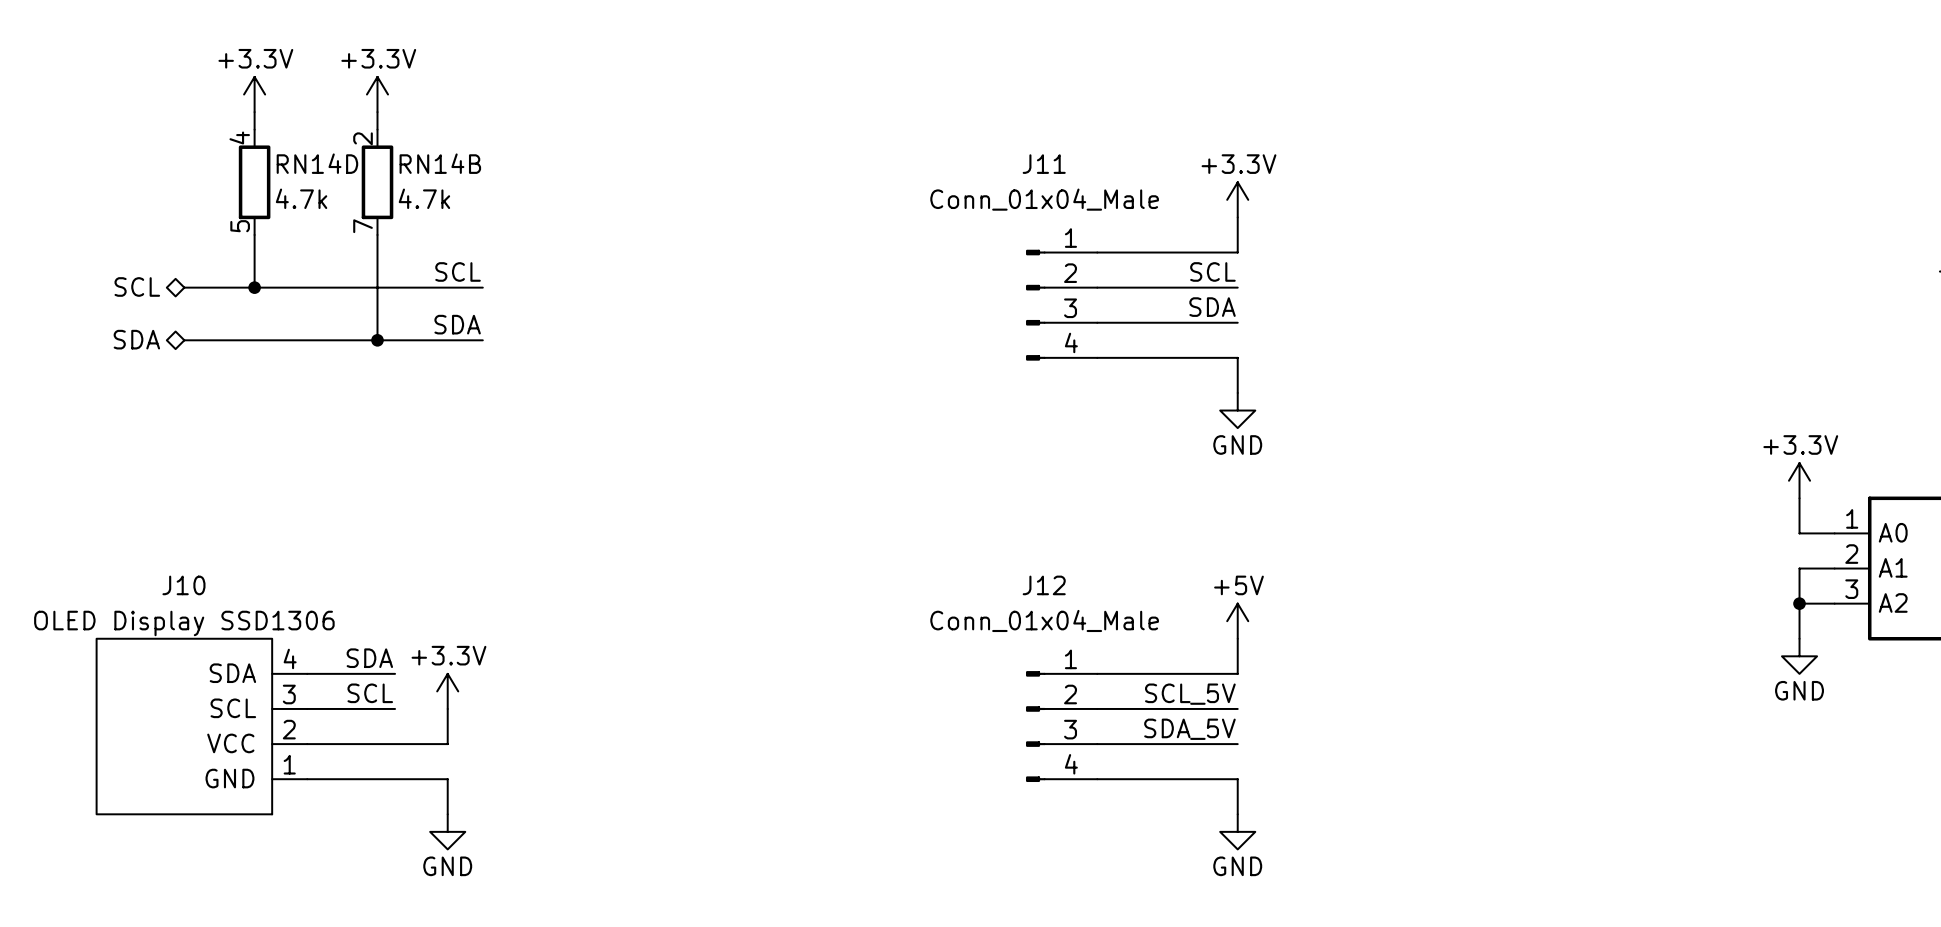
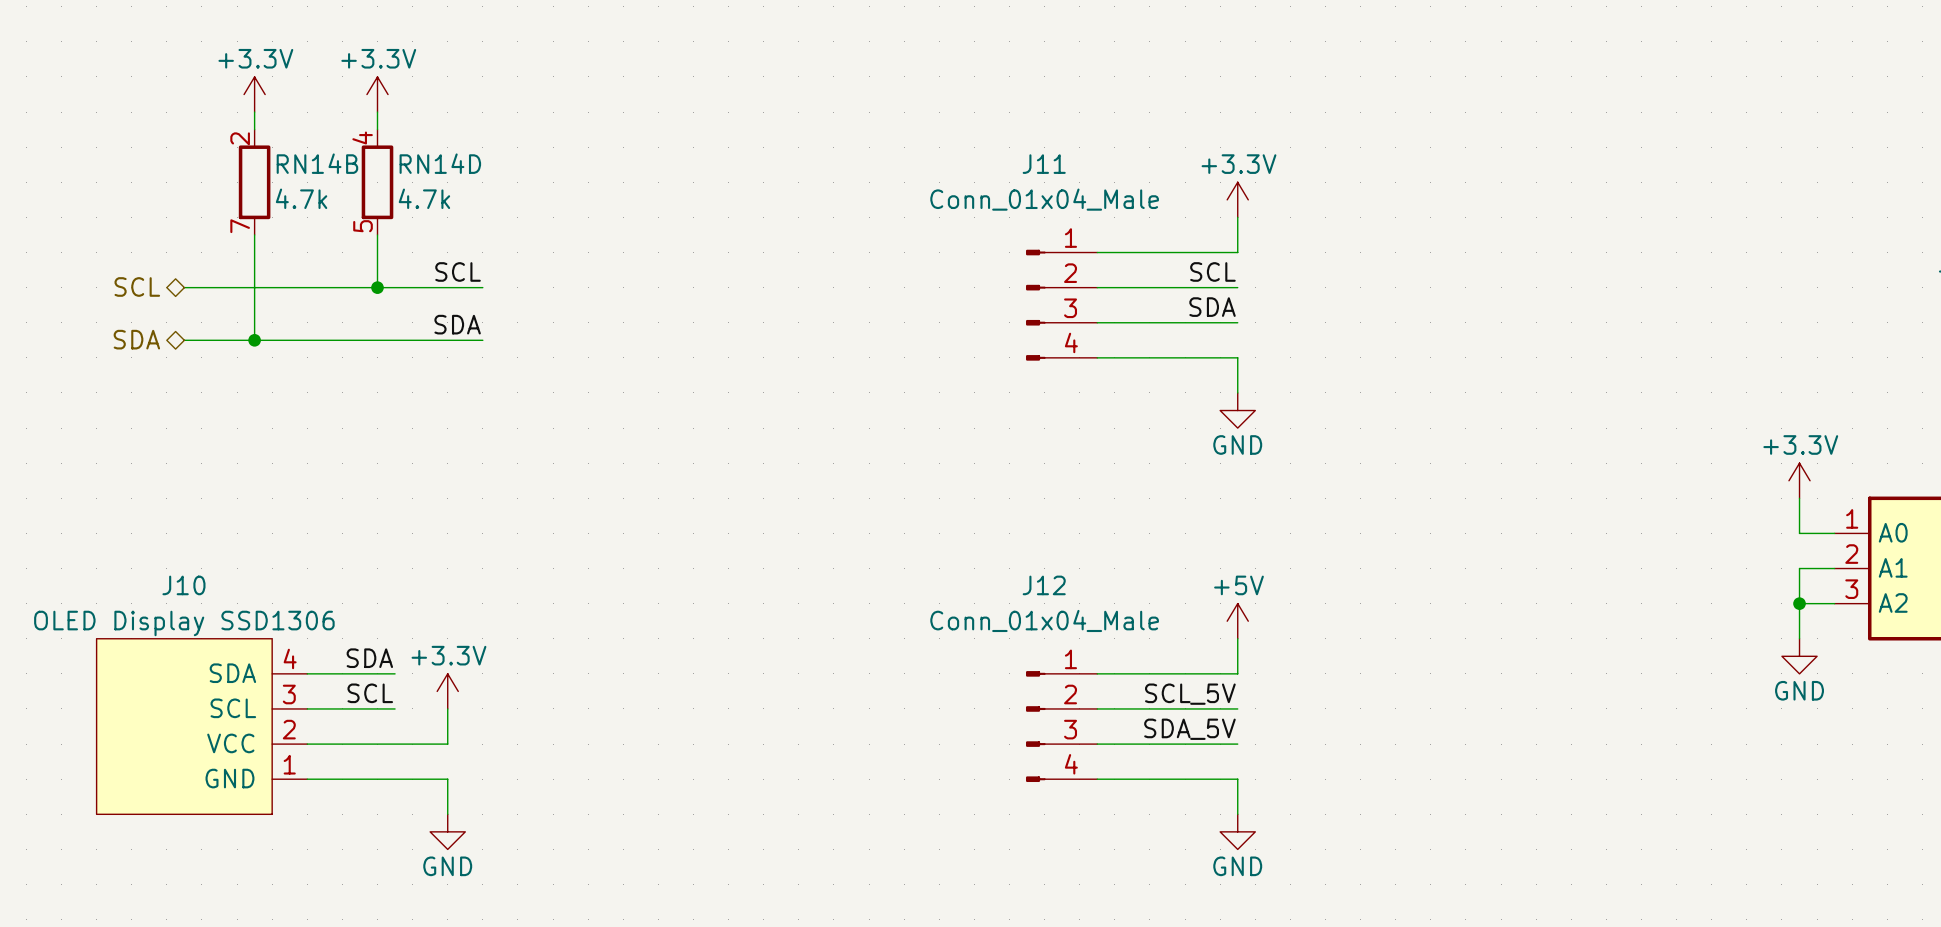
RN14D position: (254, 182) -> (377, 182)
RN14B position: (377, 182) -> (254, 182)
junction position: (254, 287) -> (254, 340)
wire: (377, 287) (377, 340) -> (254, 287) (254, 340)
junction position: (377, 340) -> (377, 287)

